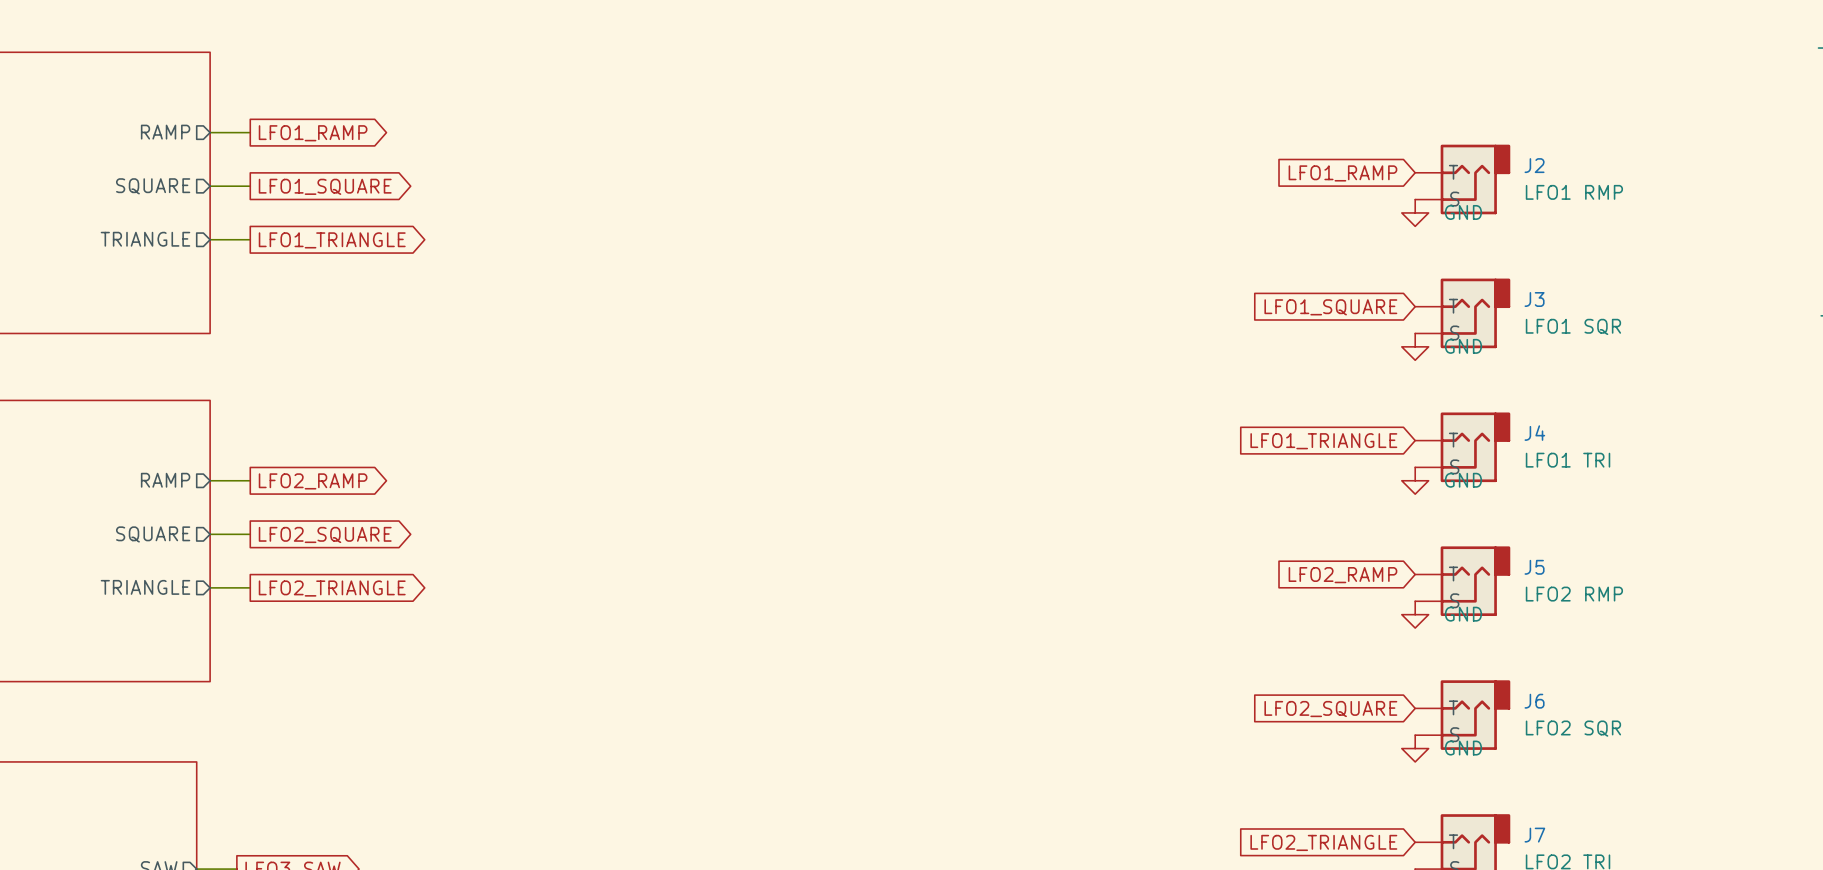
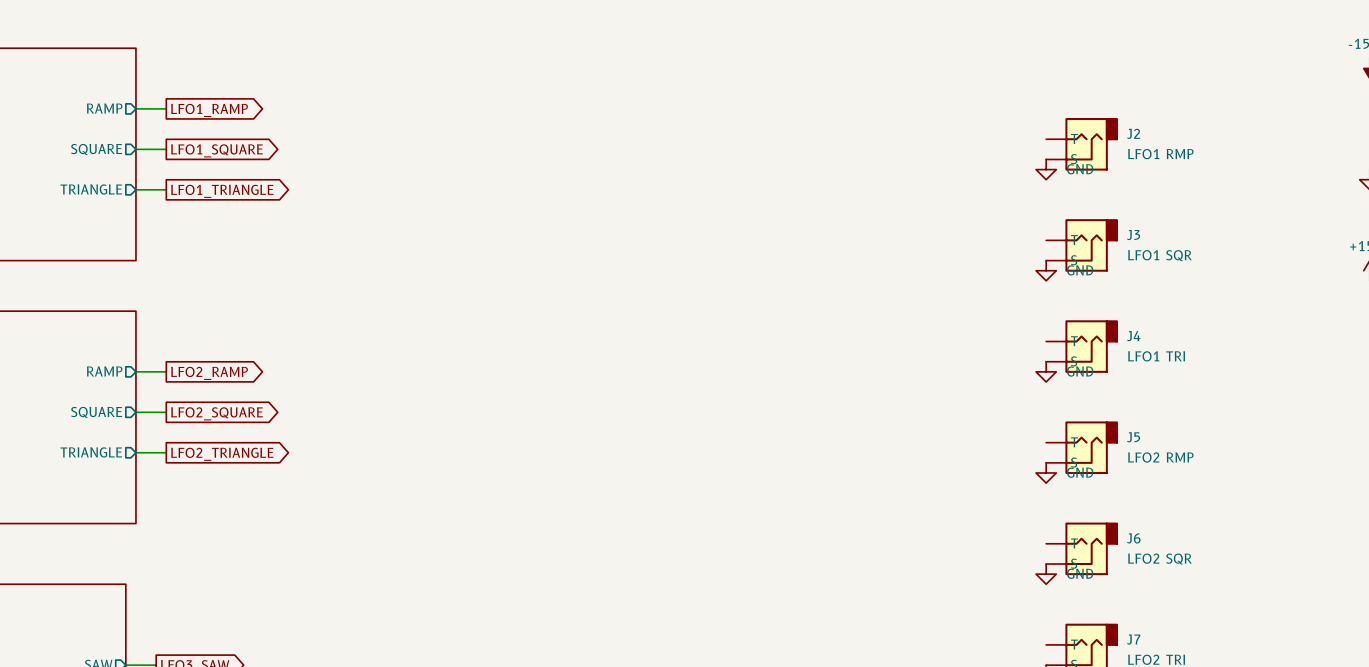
global label: LFO1_RAMP (1342, 173) -> none
global label: LFO1_SQUARE (1330, 307) -> none
global label: LFO1_TRIANGLE (1323, 441) -> none
global label: LFO2_RAMP (1342, 575) -> none
global label: LFO2_SQUARE (1330, 709) -> none
global label: LFO2_TRIANGLE (1323, 842) -> none

